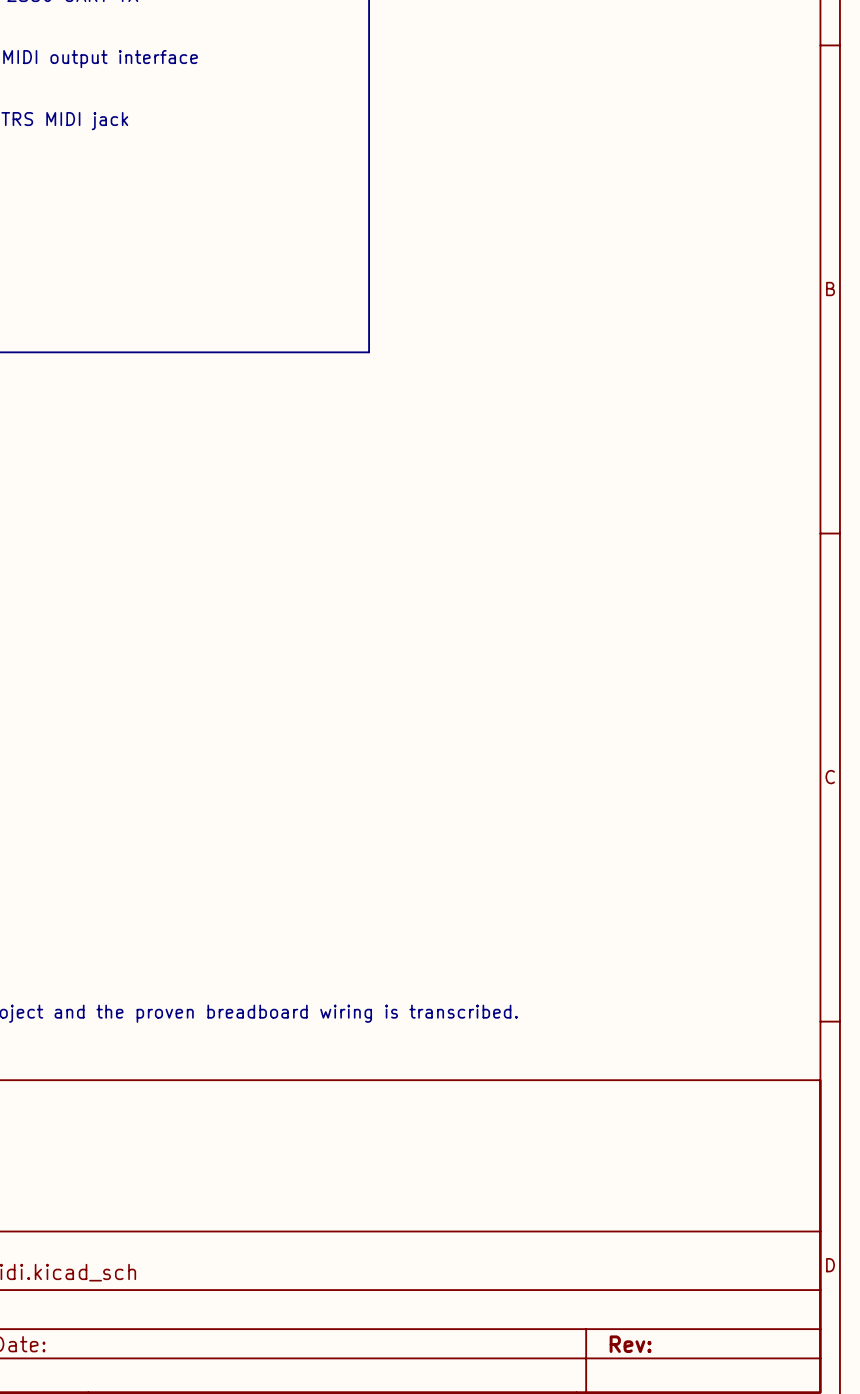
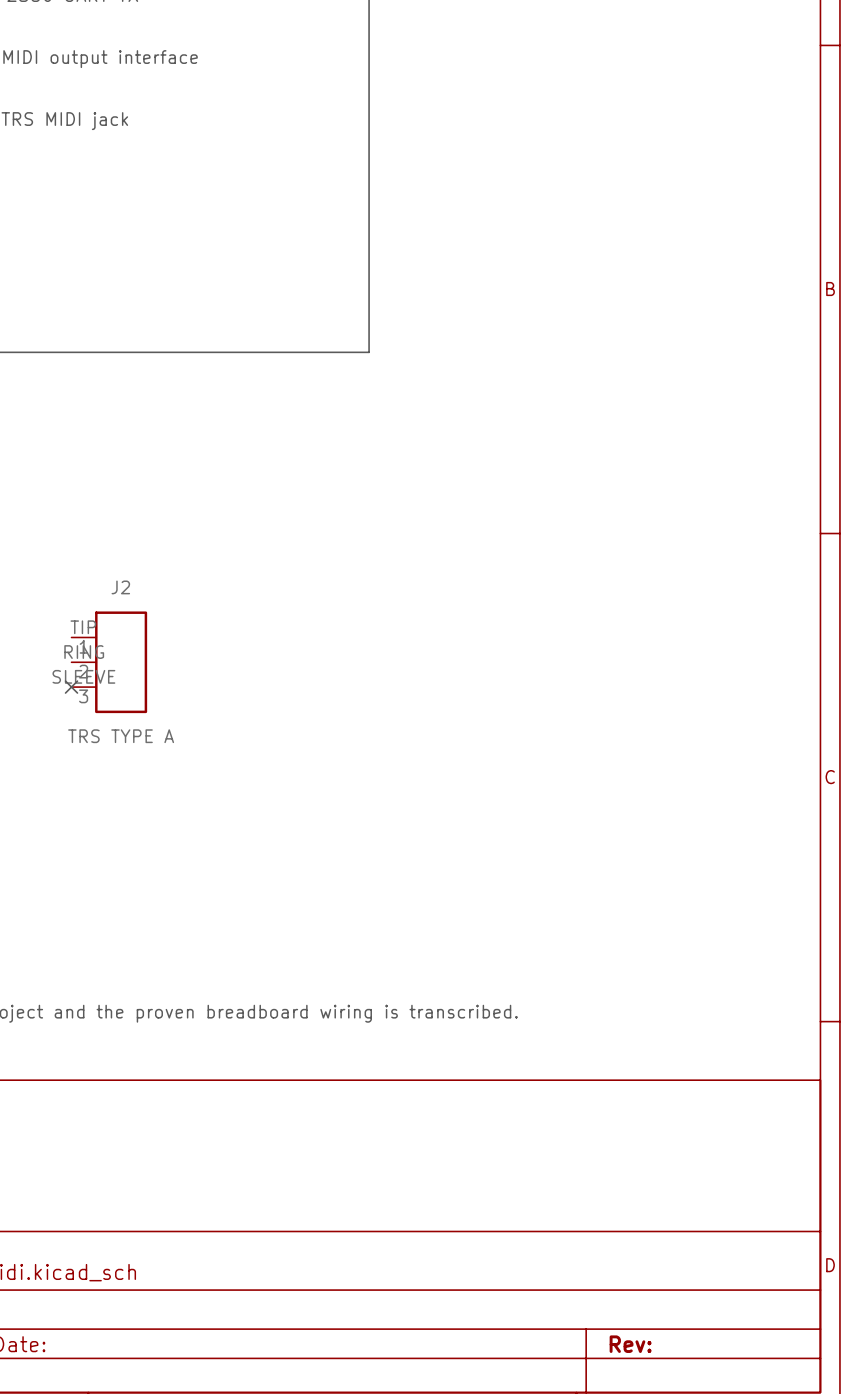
J2: none -> TRS TYPE A (109, 662)
no-connect mark: none -> (71, 687)

